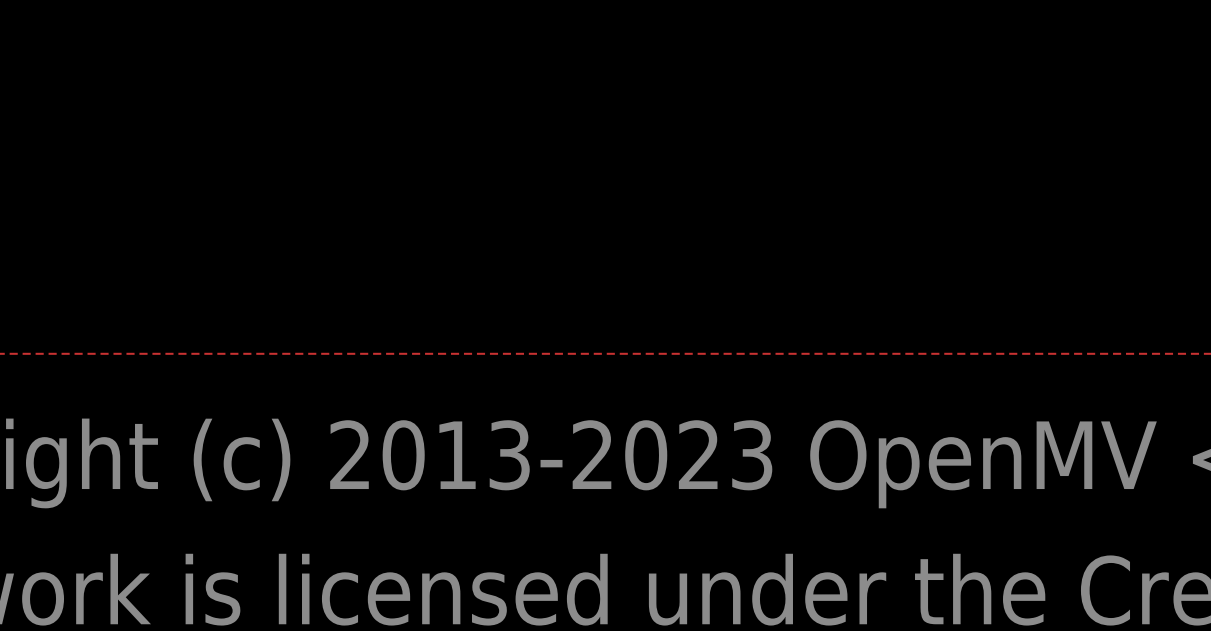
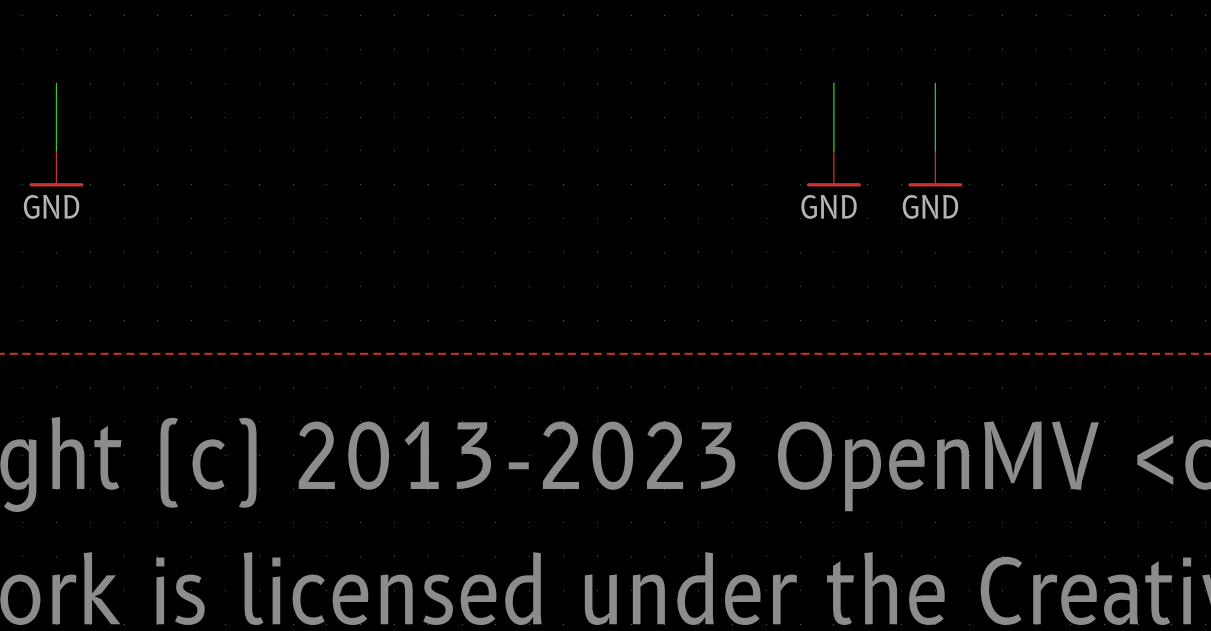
wire: none -> (56, 83) (56, 150)
wire: none -> (833, 83) (833, 150)
wire: none -> (935, 83) (935, 150)
power symbol: none -> GND (56, 168)
power symbol: none -> GND (833, 168)
power symbol: none -> GND (935, 168)

